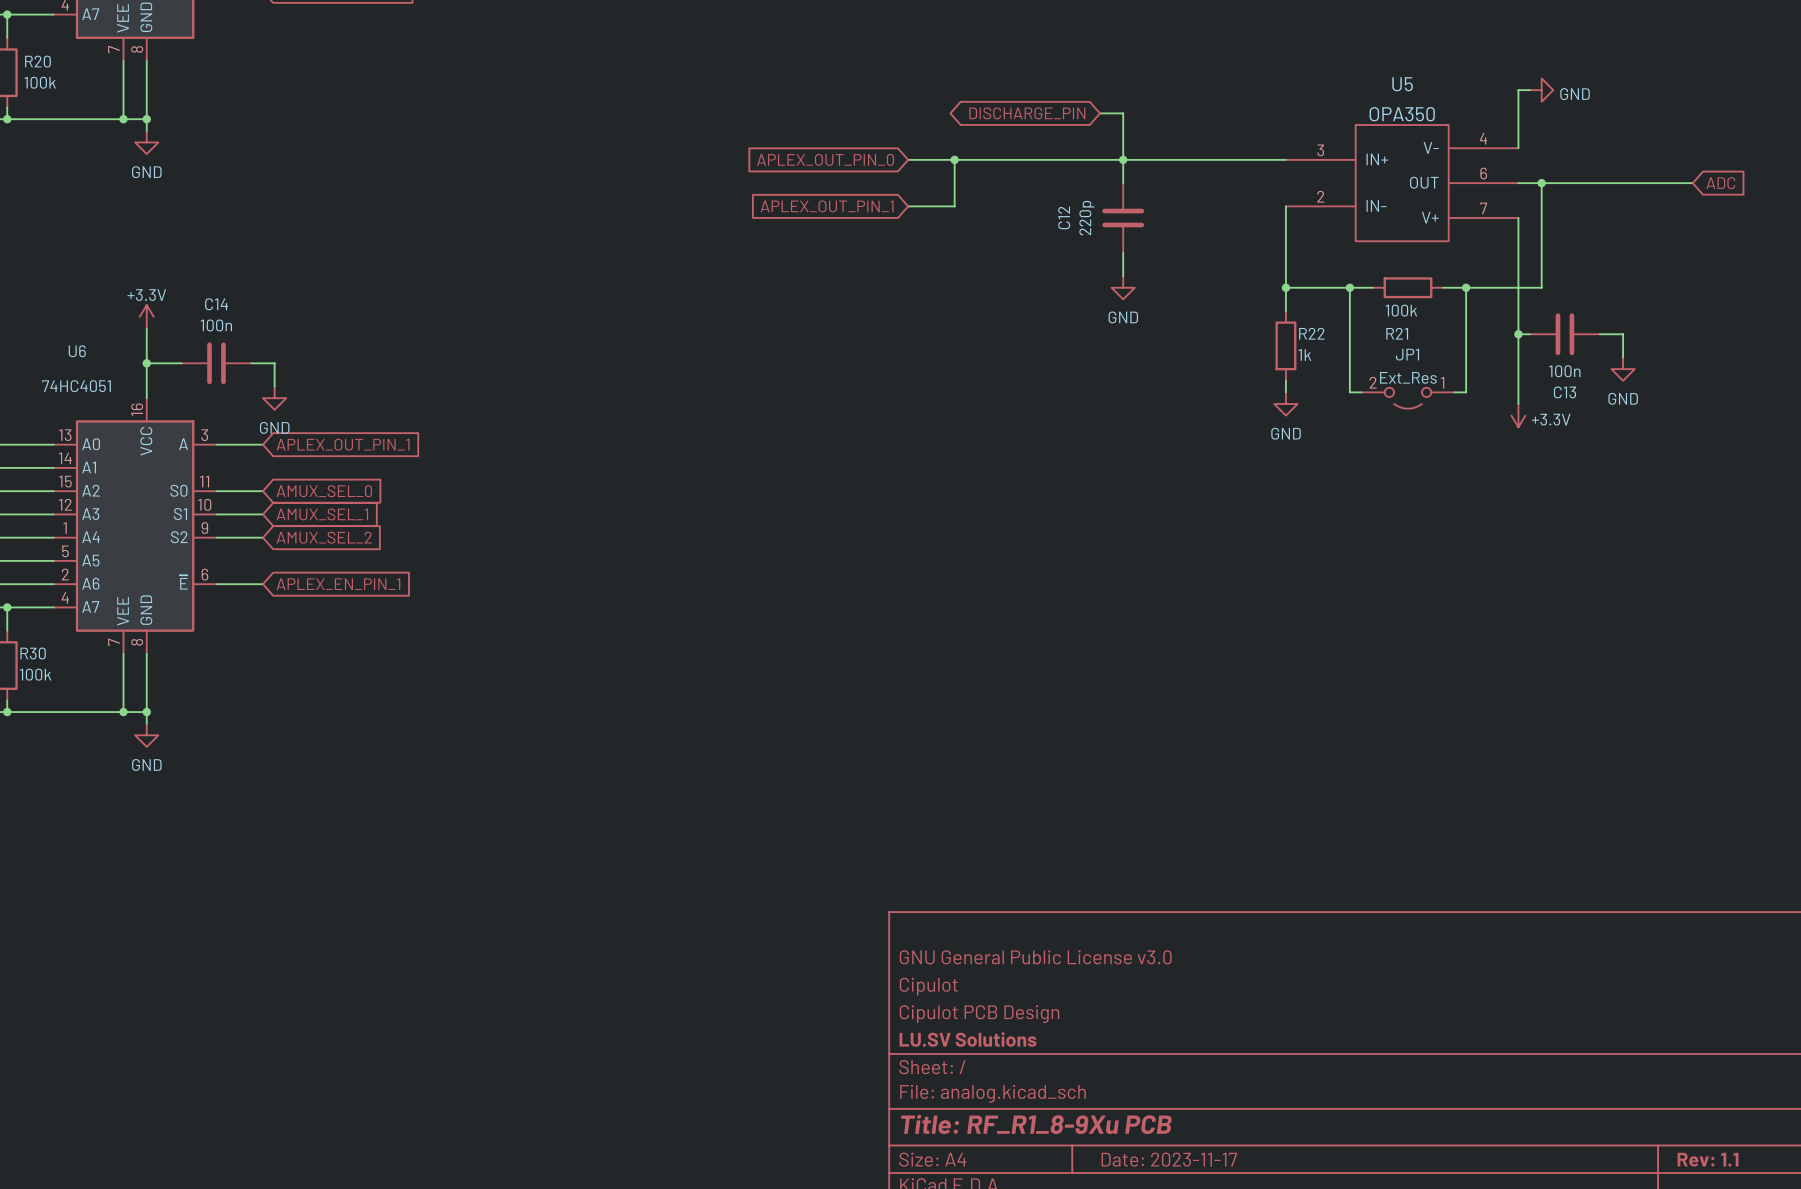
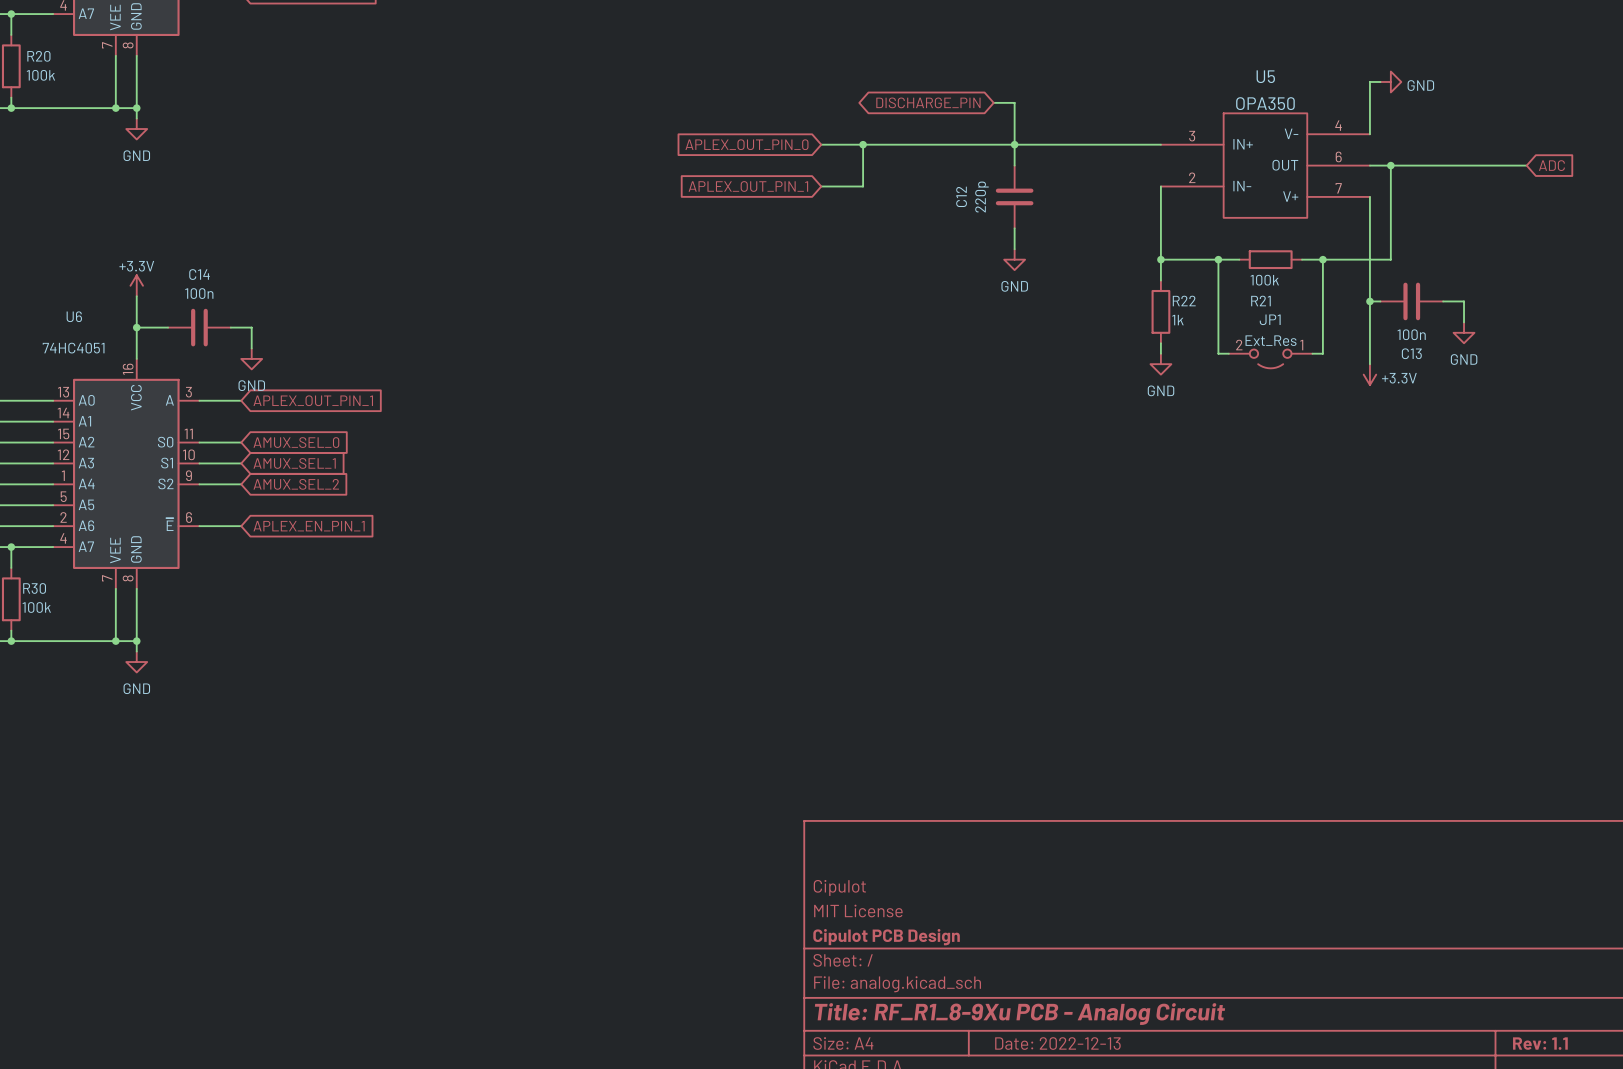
title block: GNU General Public License v3.0 (1035, 957) -> none
title block: Cipulot PCB Design (979, 1014) -> MIT License (858, 911)
title block: LU.SV Solutions (968, 1039) -> Cipulot PCB Design (886, 937)
title block: Title: RF_R1_8-9Xu PCB (1036, 1124) -> Title: RF_R1_8-9Xu PCB - Analog Circuit (1019, 1014)
title block: Date: 2023-11-17 (1169, 1159) -> Date: 2022-12-13 (1057, 1043)

